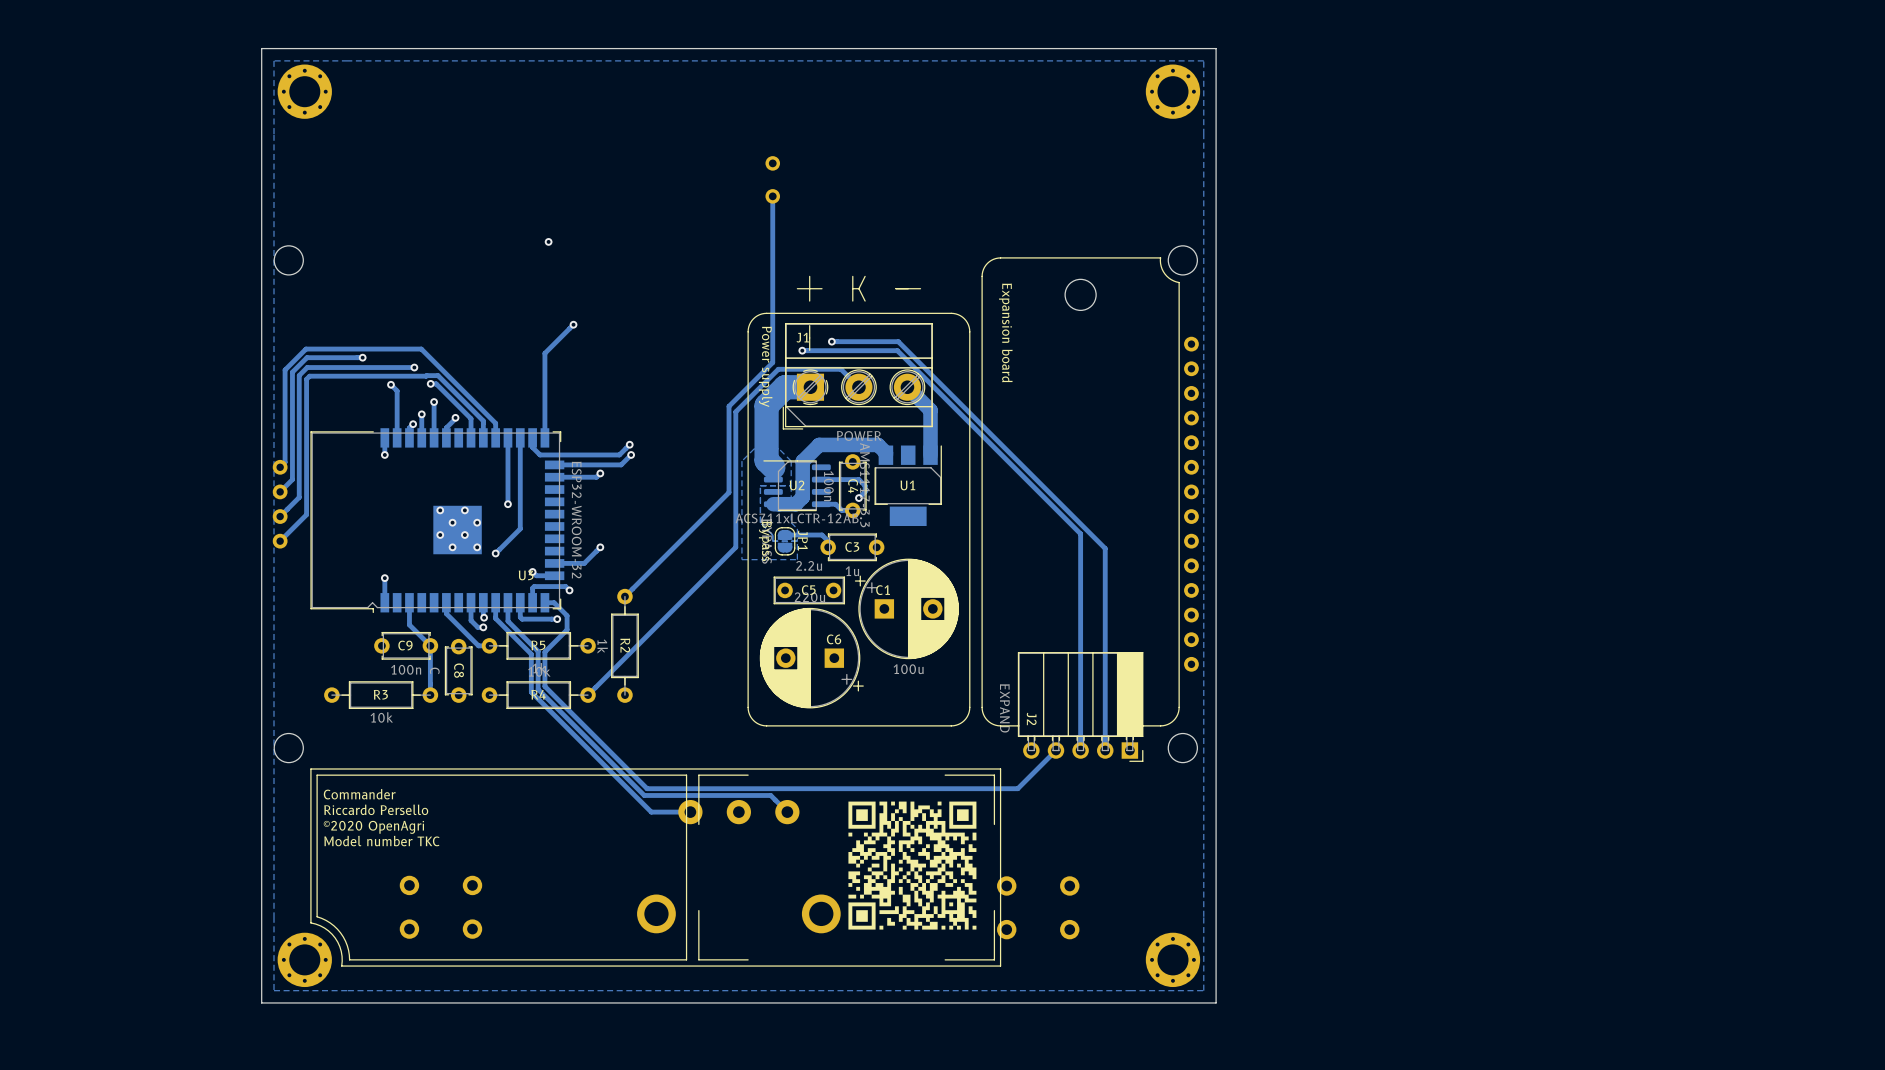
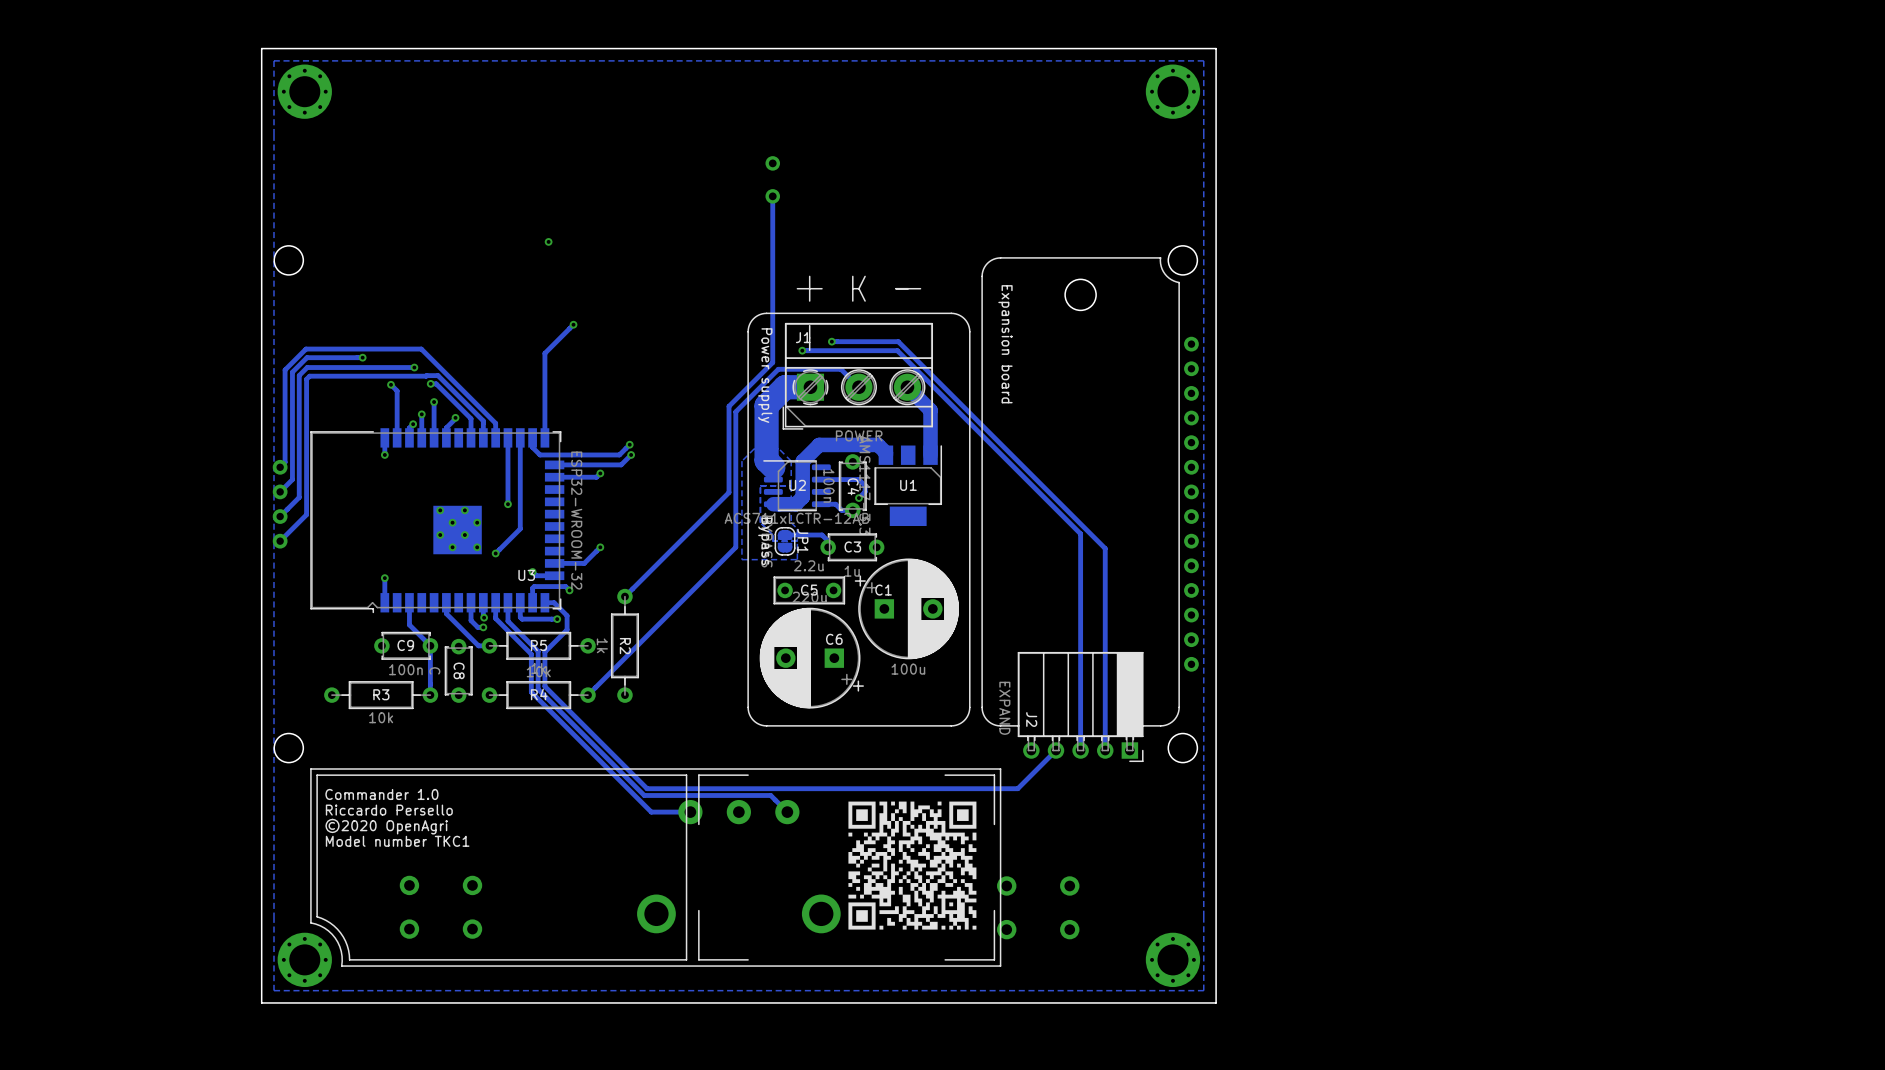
text: Commander (359, 794) -> Commander 1.0 (381, 794)
text: Model number TKC (381, 841) -> Model number TKC1 (397, 841)

